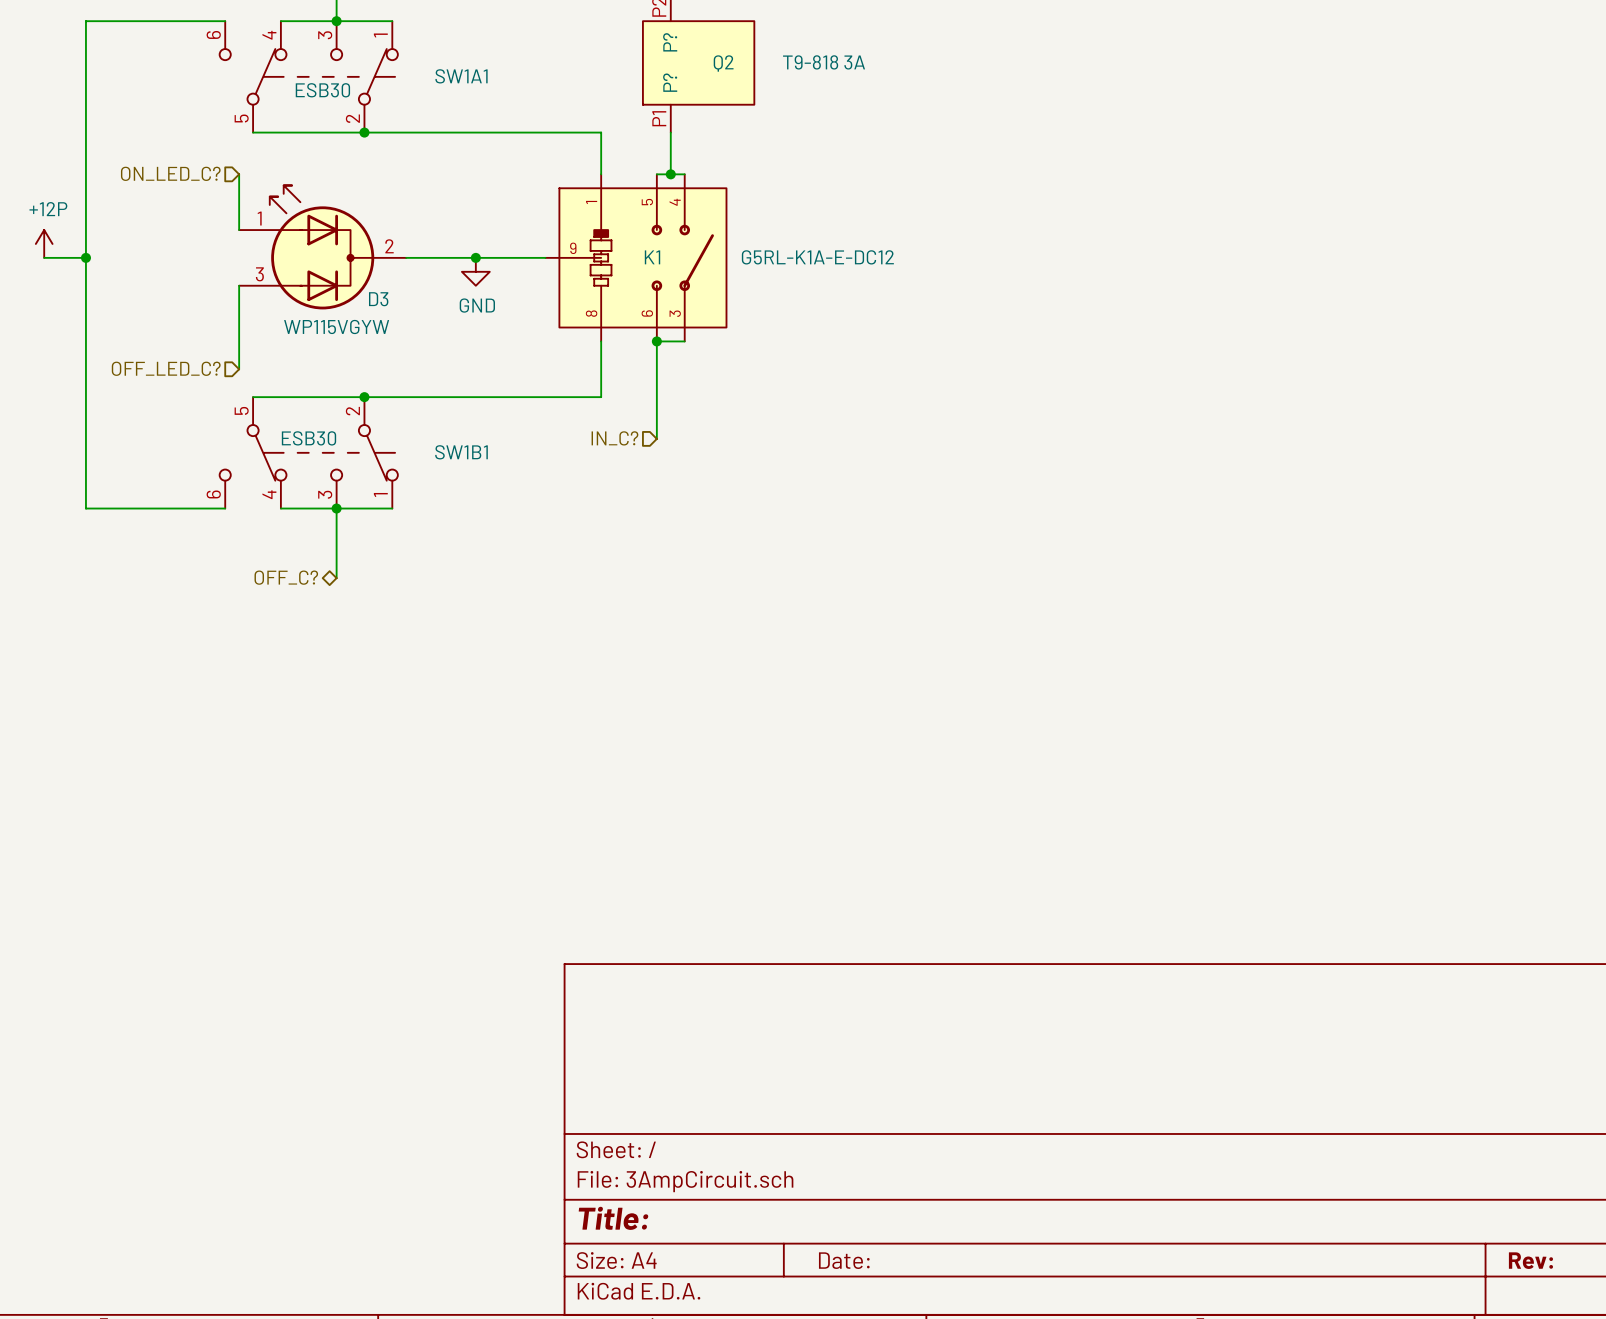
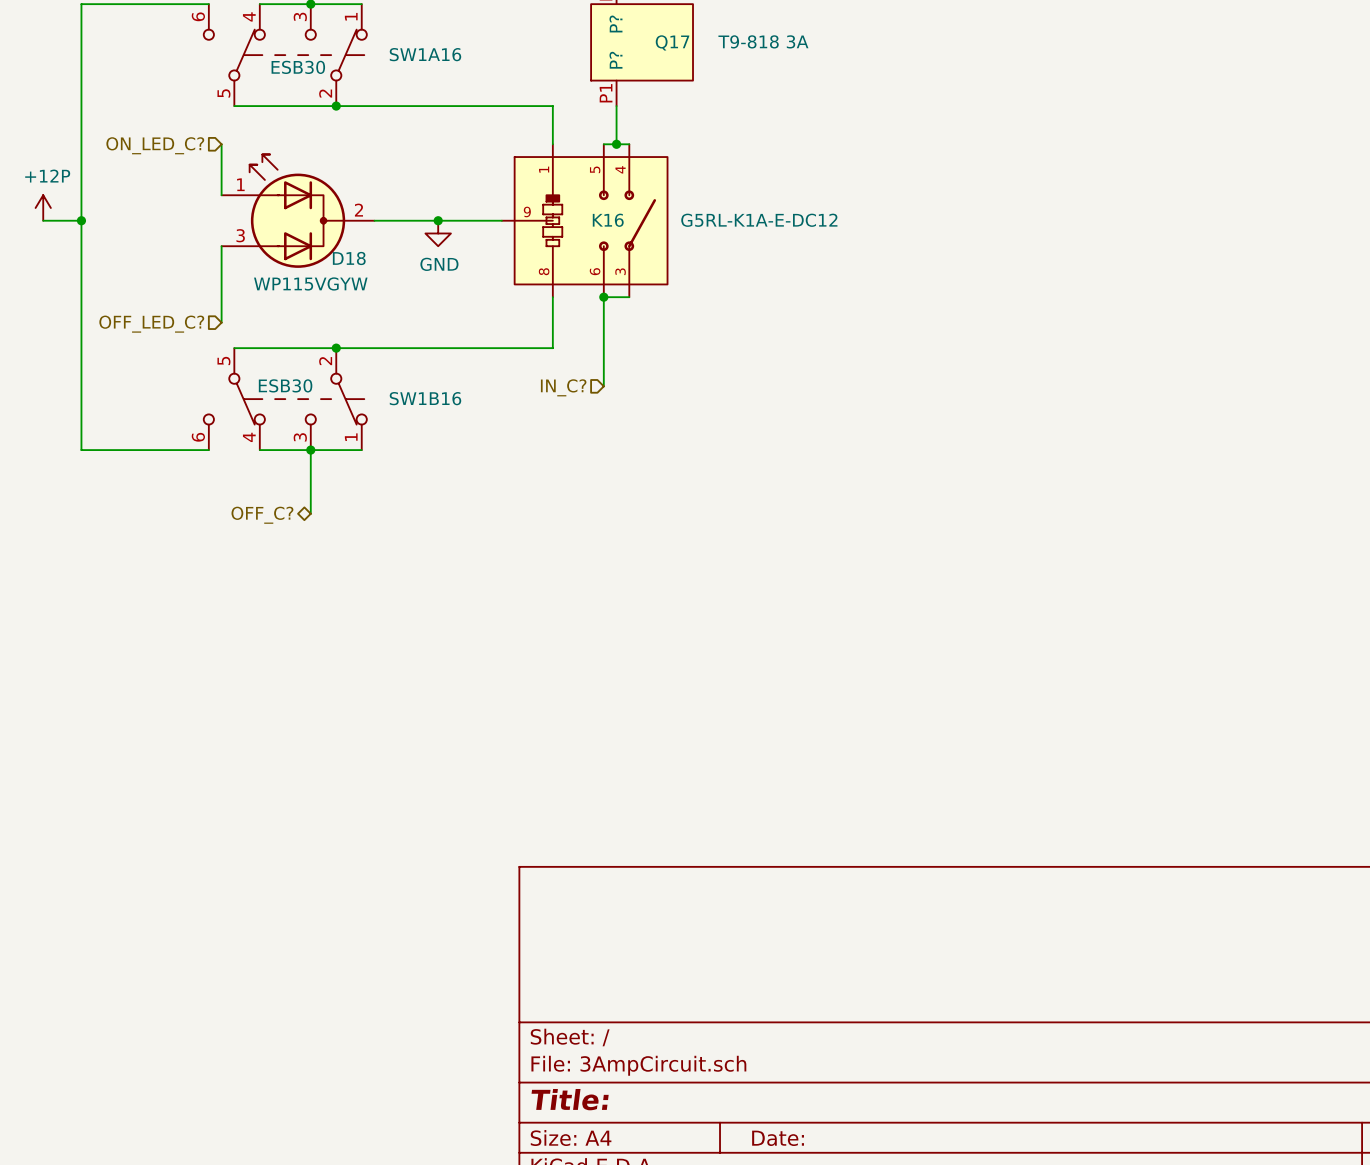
Q2 name: Q2 (723, 63) -> Q17 (672, 42)
SW1A1 name: SW1A1 (461, 76) -> SW1A16 (425, 54)
K1 name: K1 (652, 257) -> K16 (608, 220)
D3 name: D3 (378, 299) -> D18 (349, 258)
SW1B1 name: SW1B1 (461, 452) -> SW1B16 (425, 398)

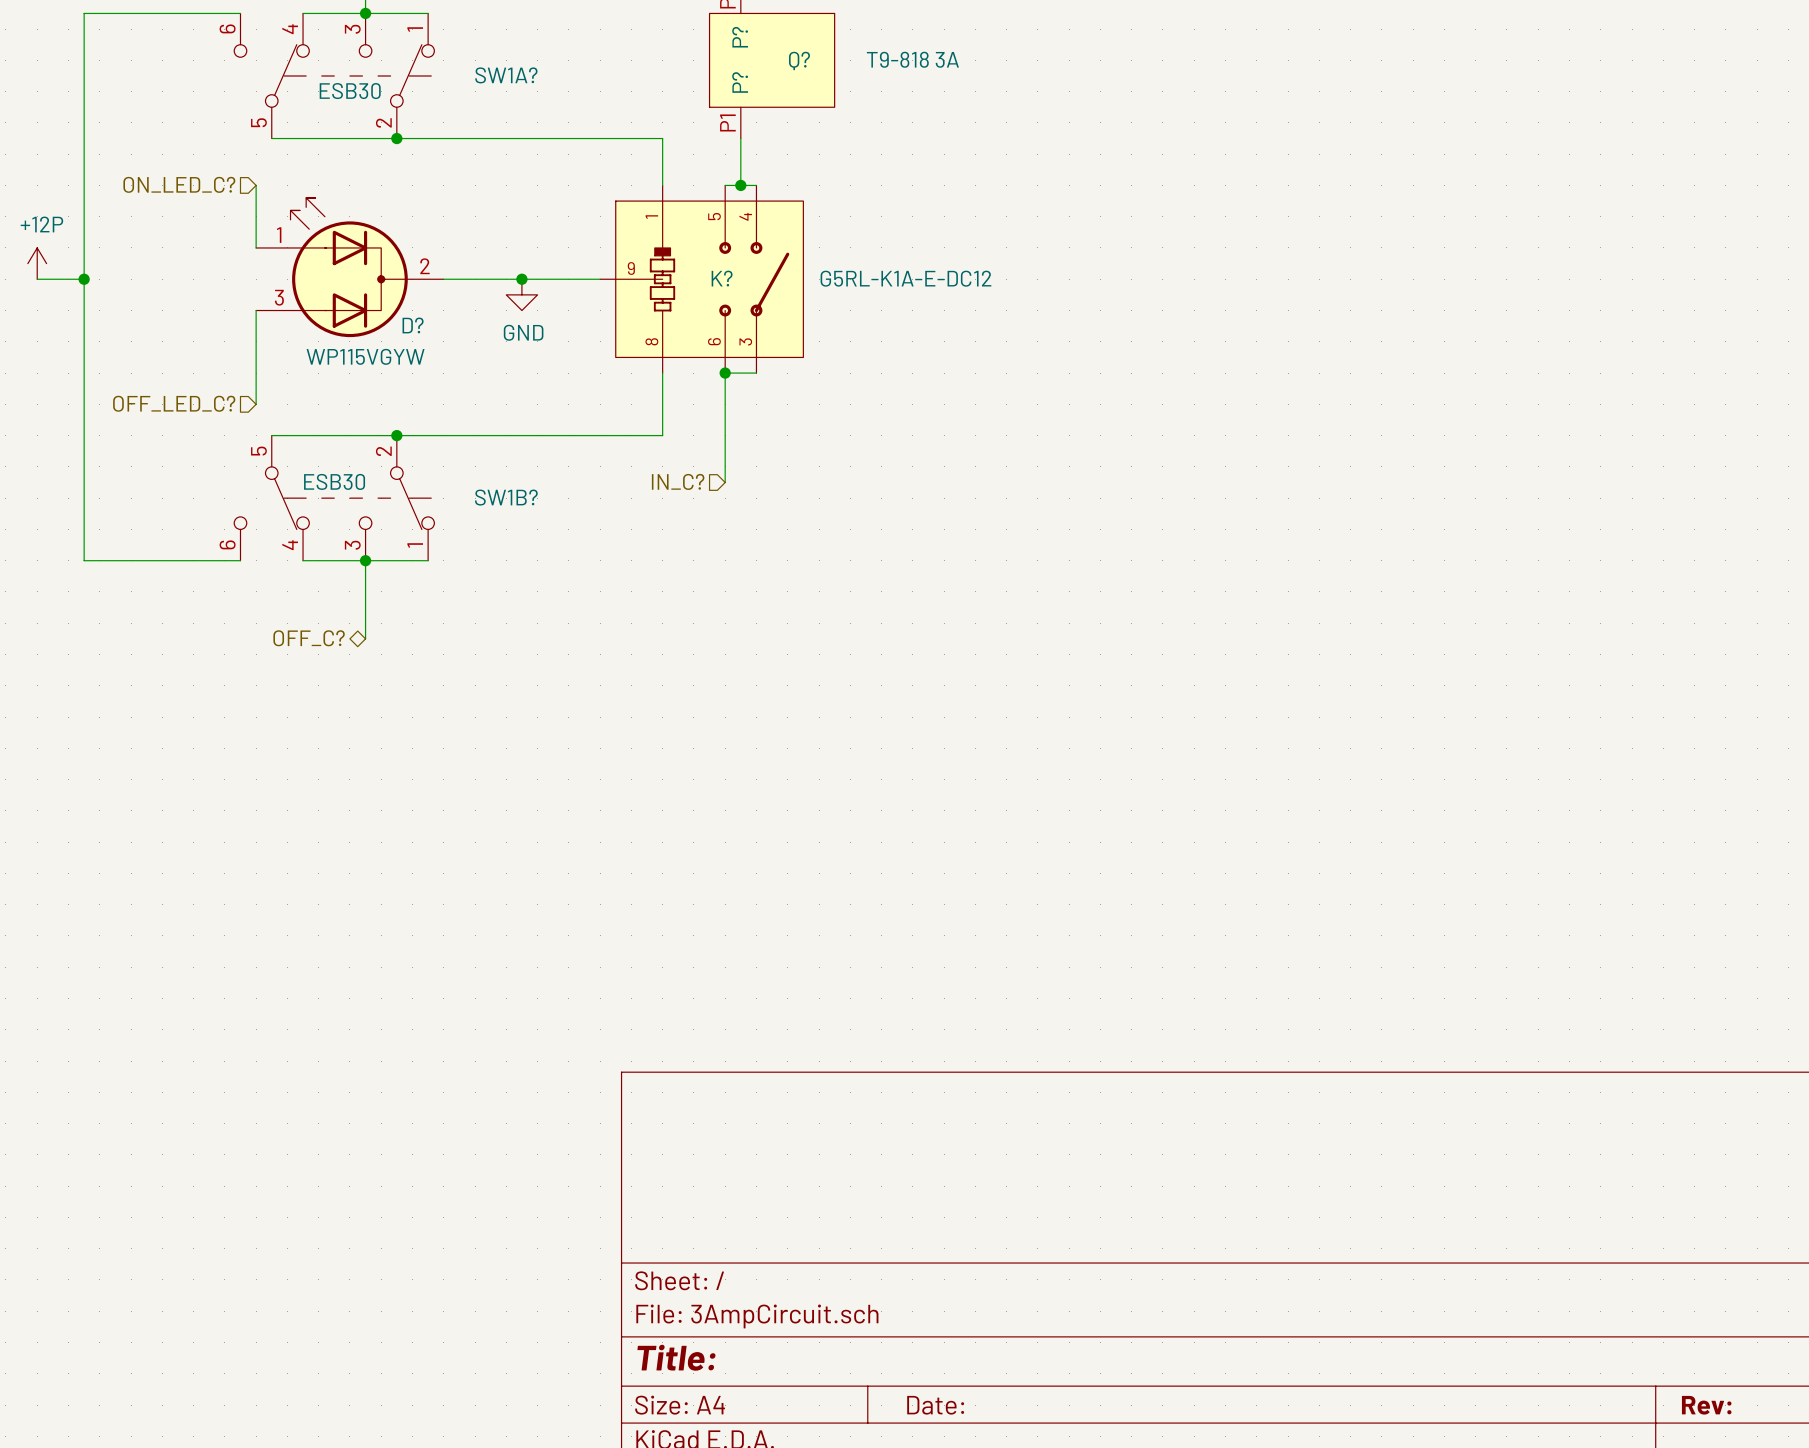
Q17 name: Q17 (672, 42) -> Q? (799, 60)
SW1A16 name: SW1A16 (425, 54) -> SW1A? (506, 75)
K16 name: K16 (608, 220) -> K? (722, 278)
D18 name: D18 (349, 258) -> D? (413, 325)
SW1B16 name: SW1B16 (425, 398) -> SW1B? (506, 497)

